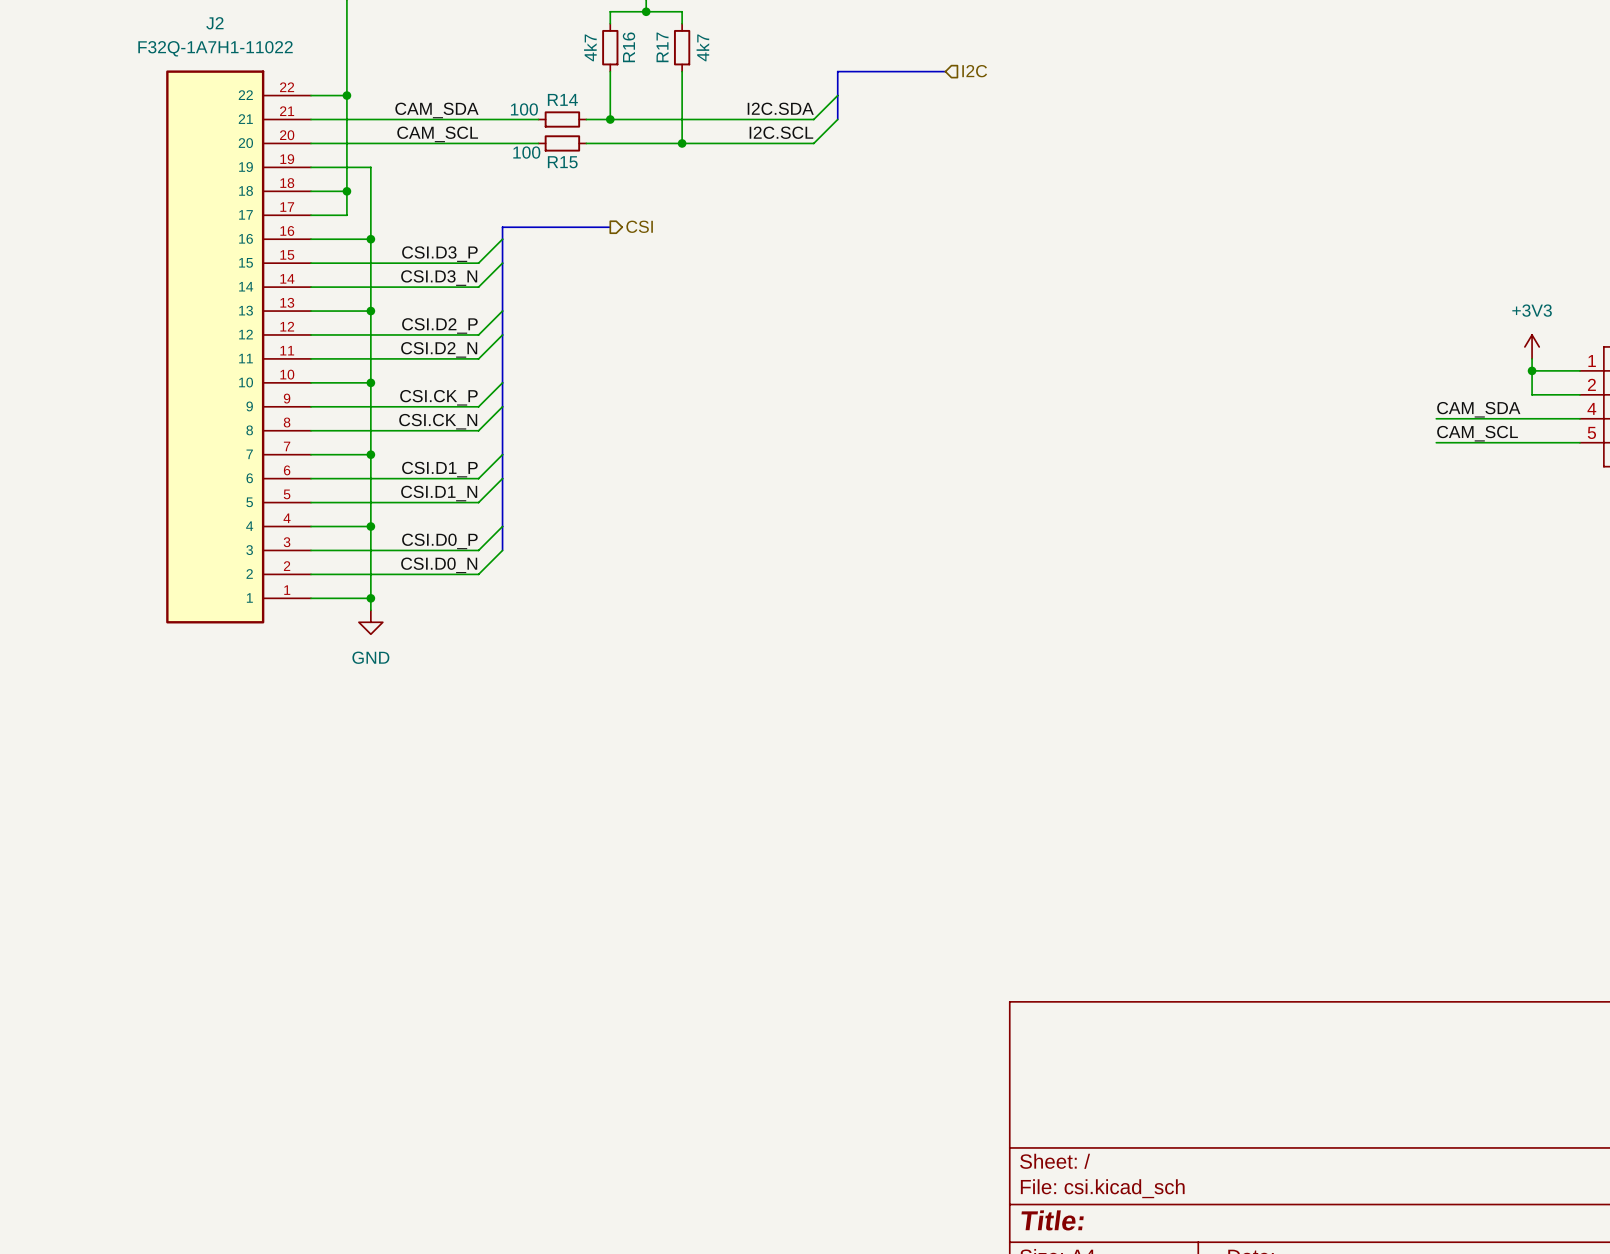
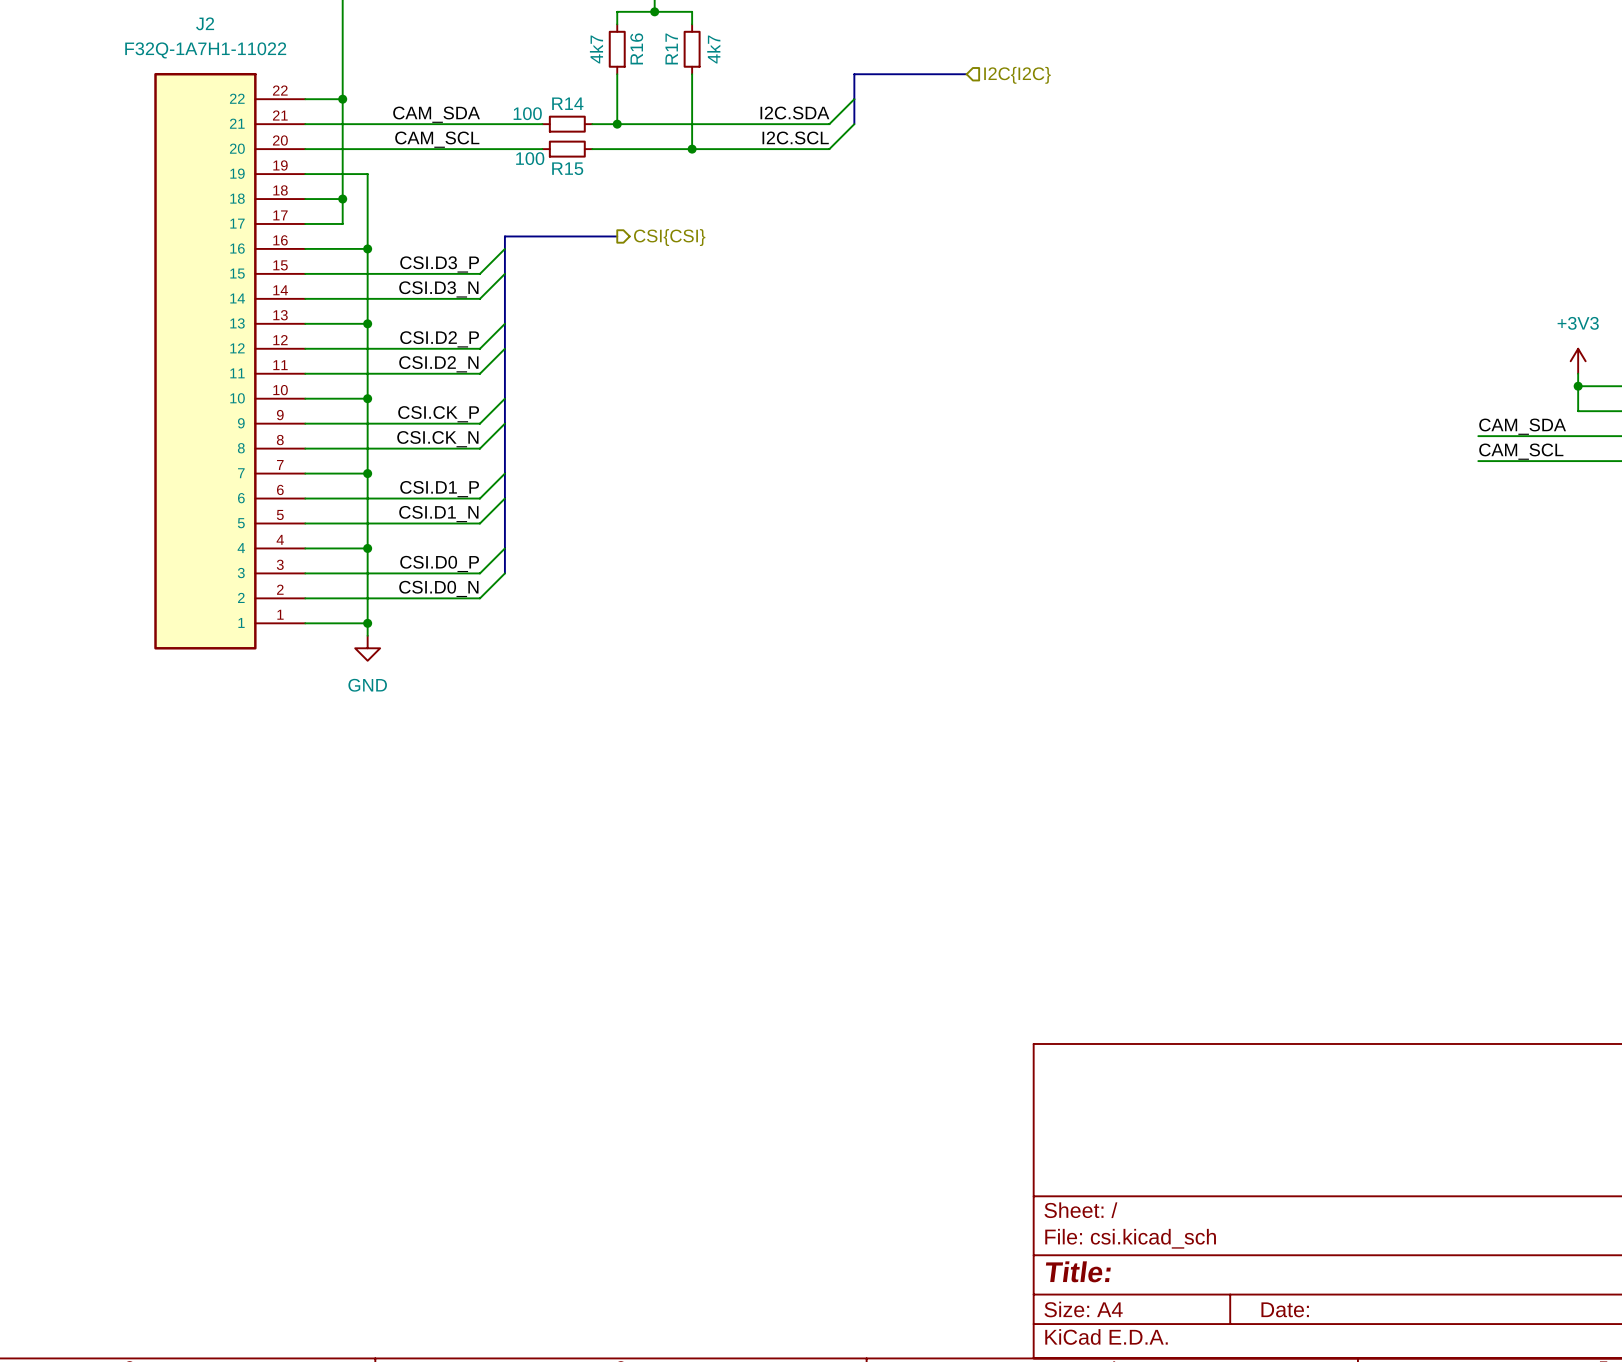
hierarchical label: I2C (974, 71) -> I2C{I2C} (1017, 75)
hierarchical label: CSI (639, 226) -> CSI{CSI} (669, 237)

